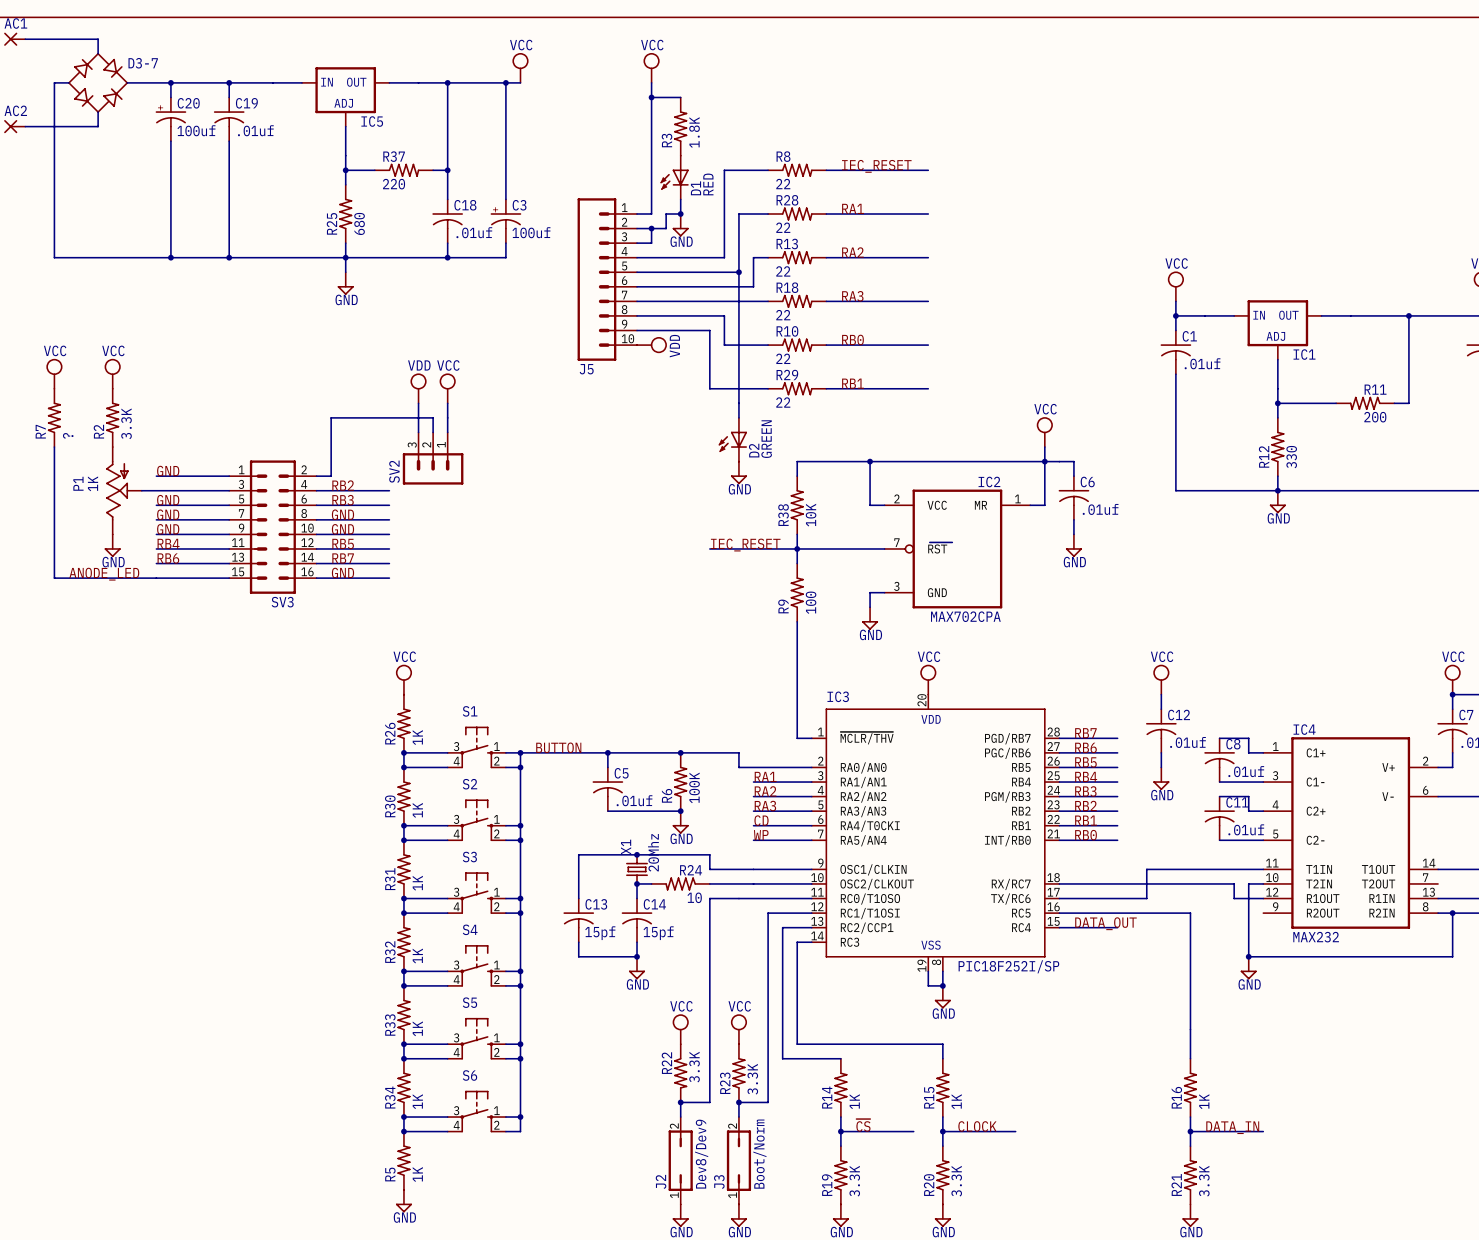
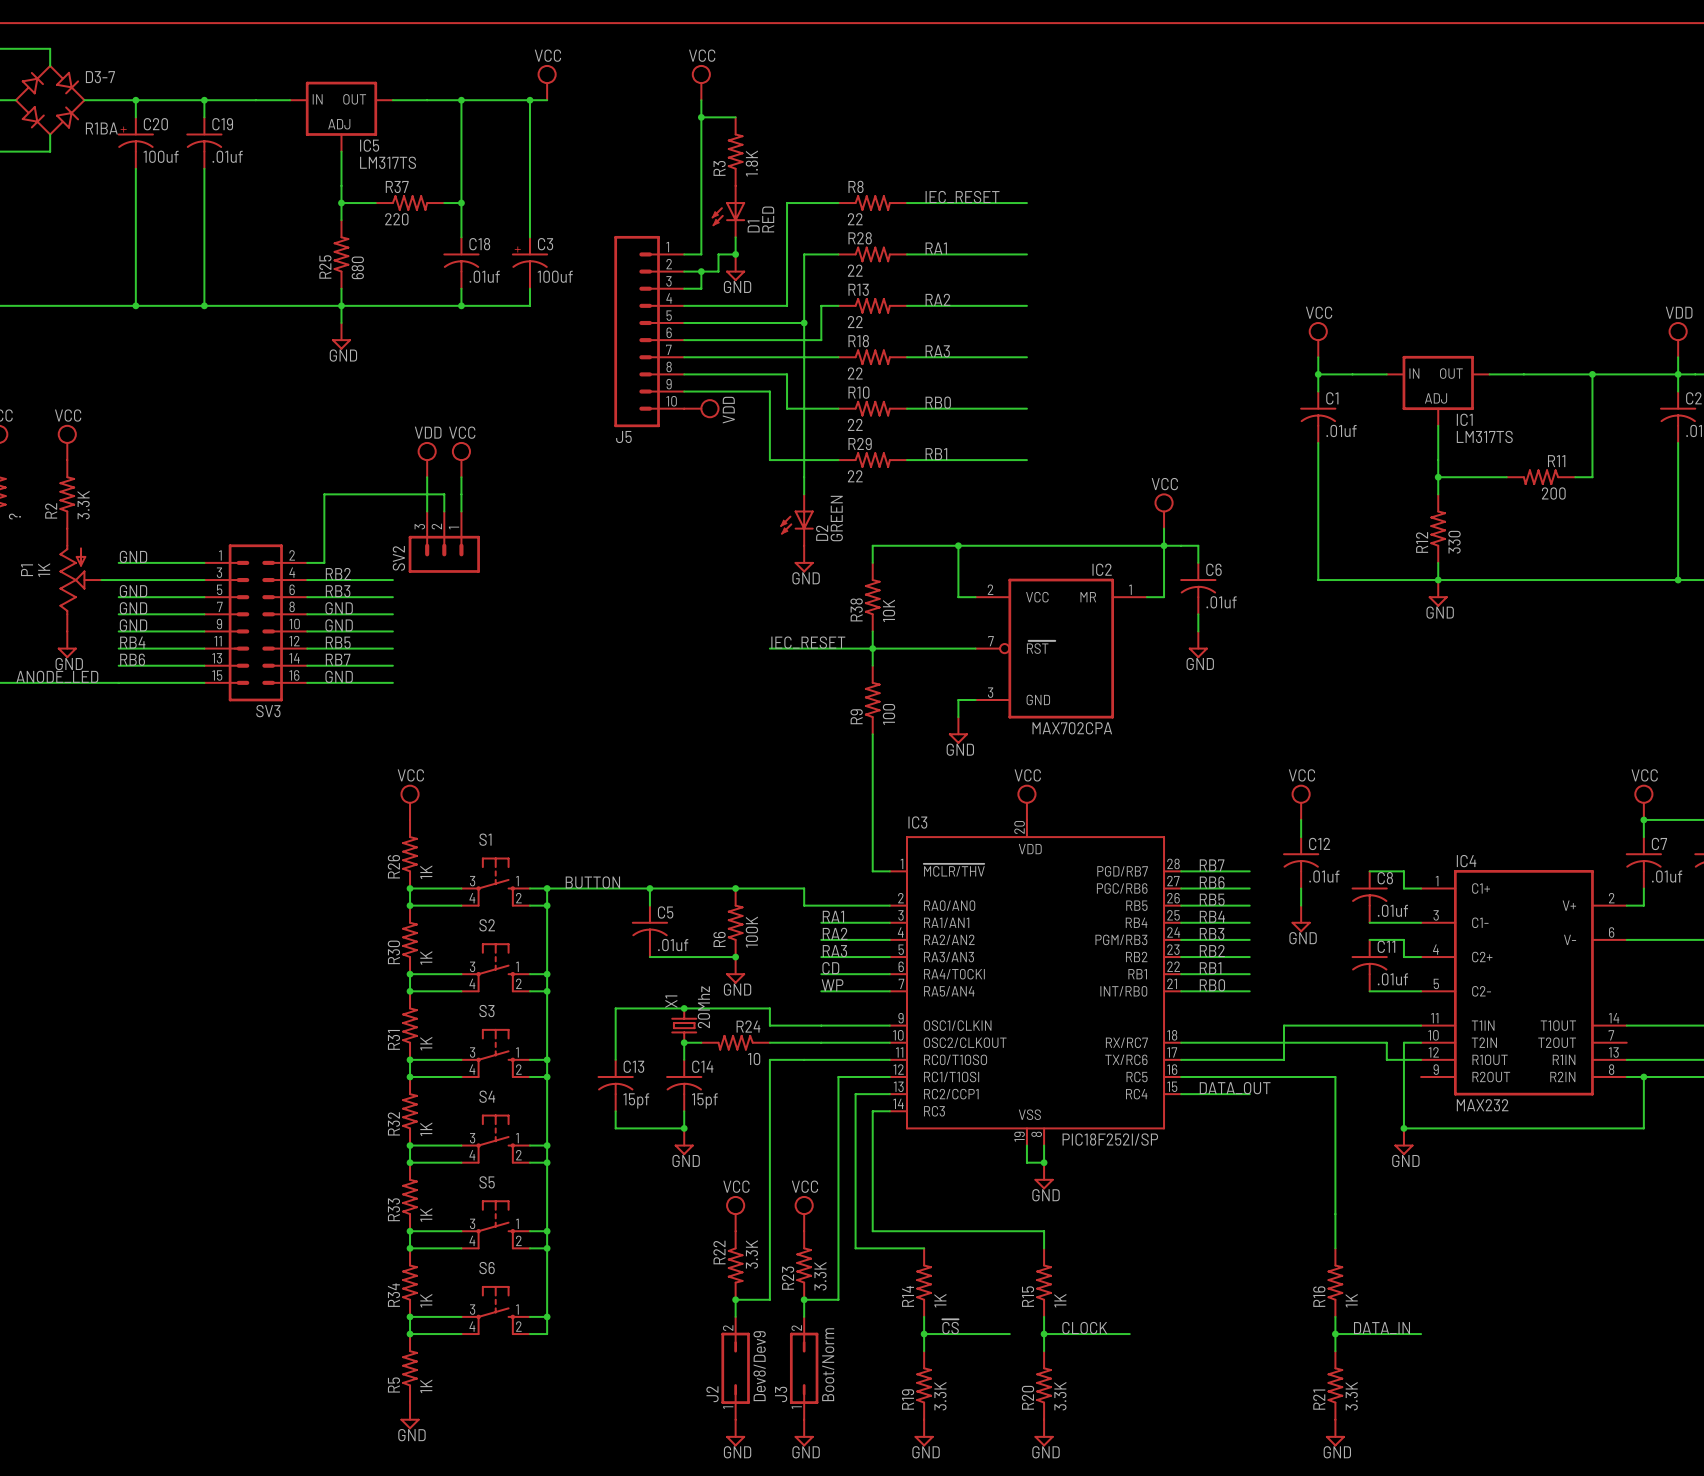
D3-7 value: none -> R1BA (101, 128)
IC5 value: none -> LM317TS (388, 162)
IC1 value: none -> LM317TS (1484, 436)

